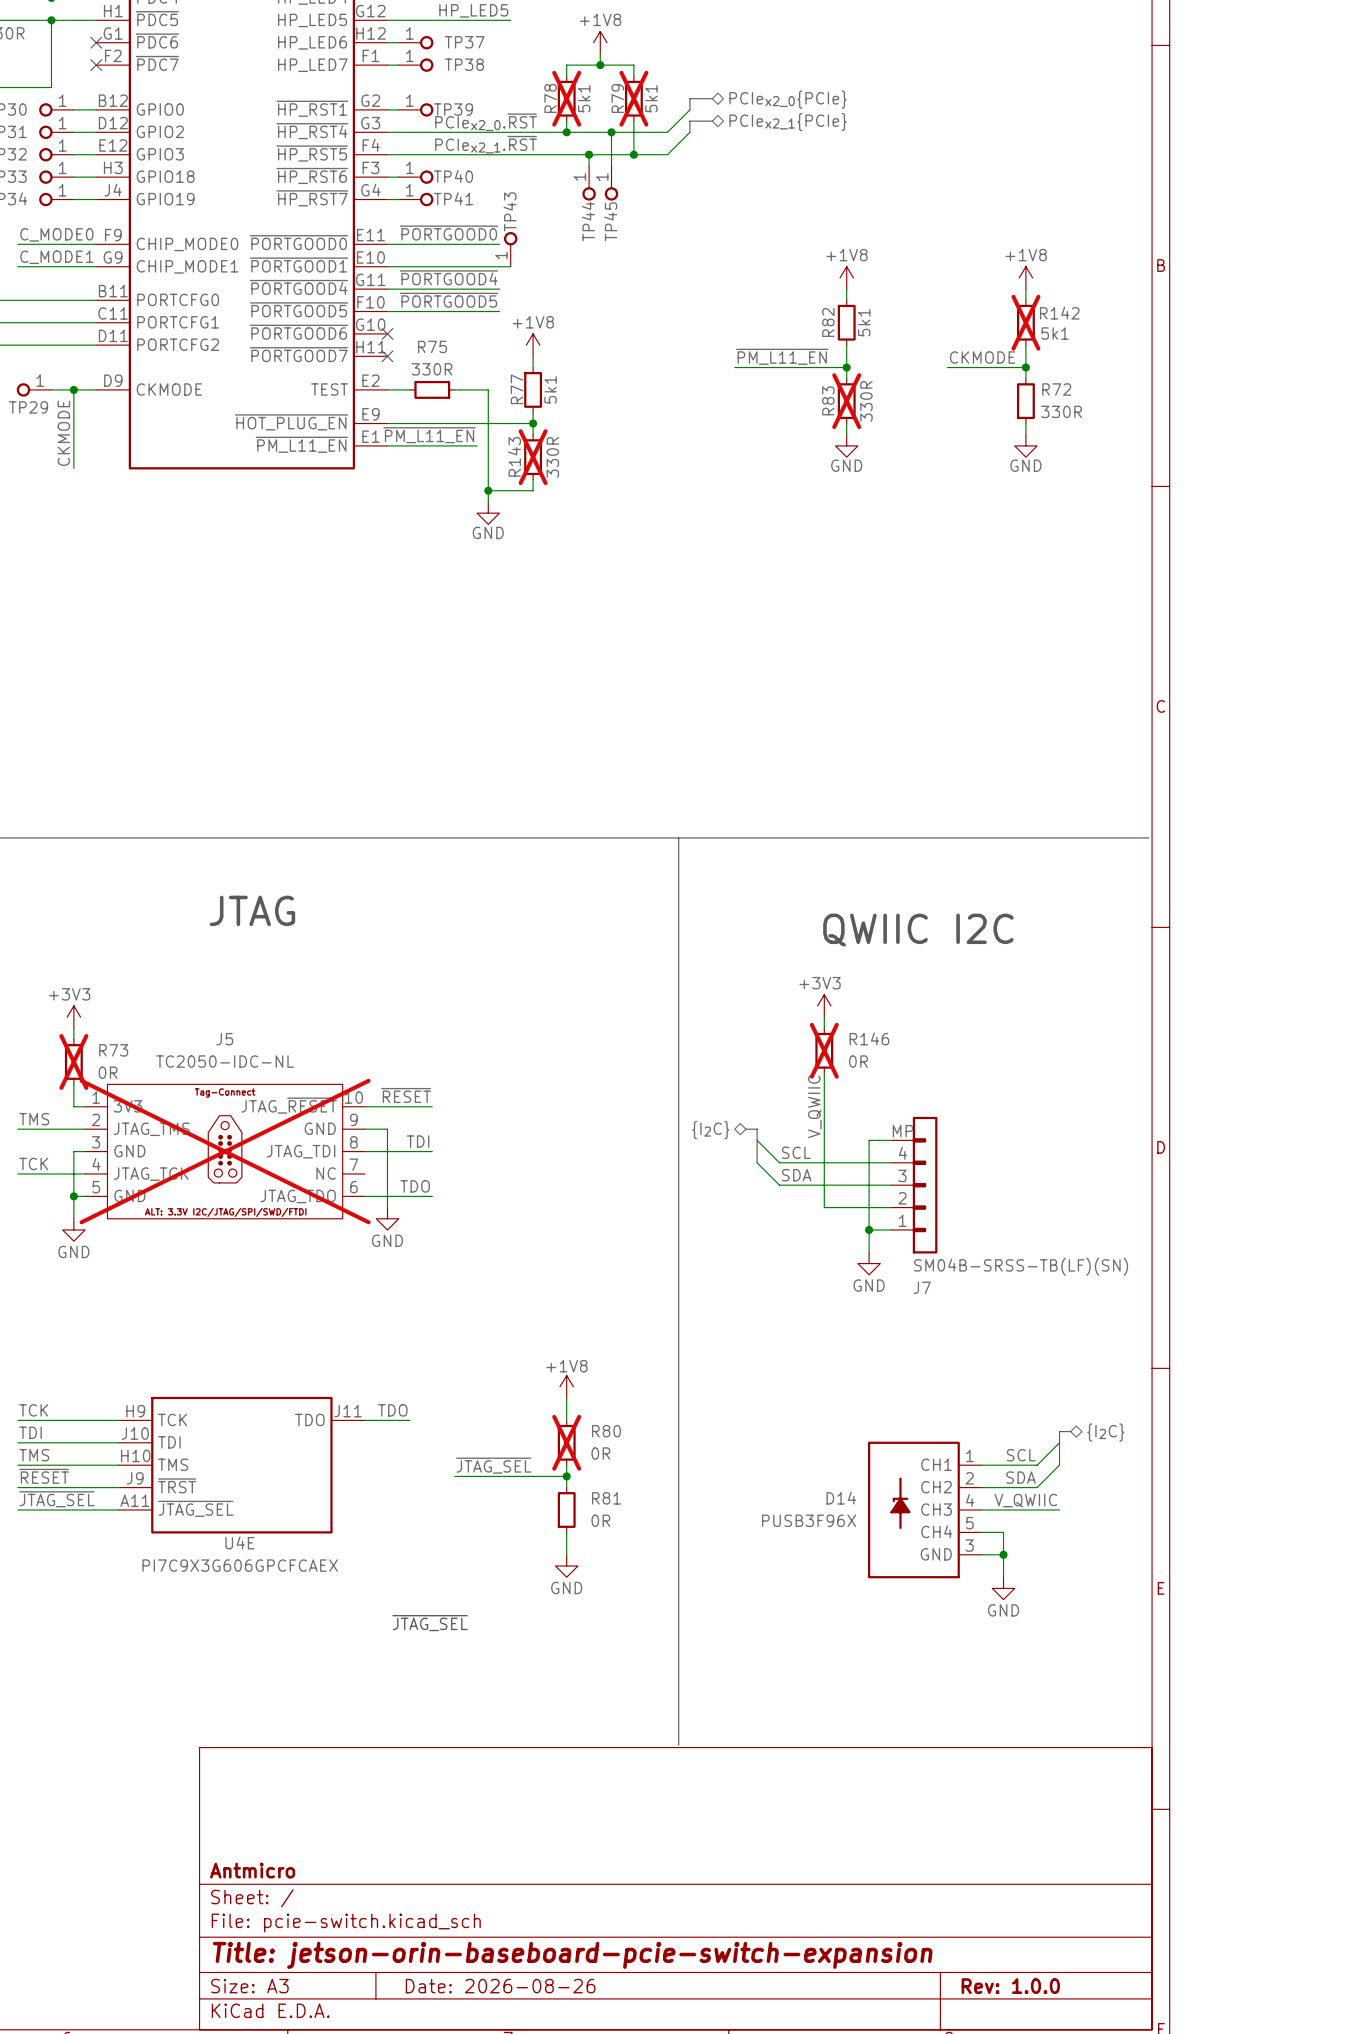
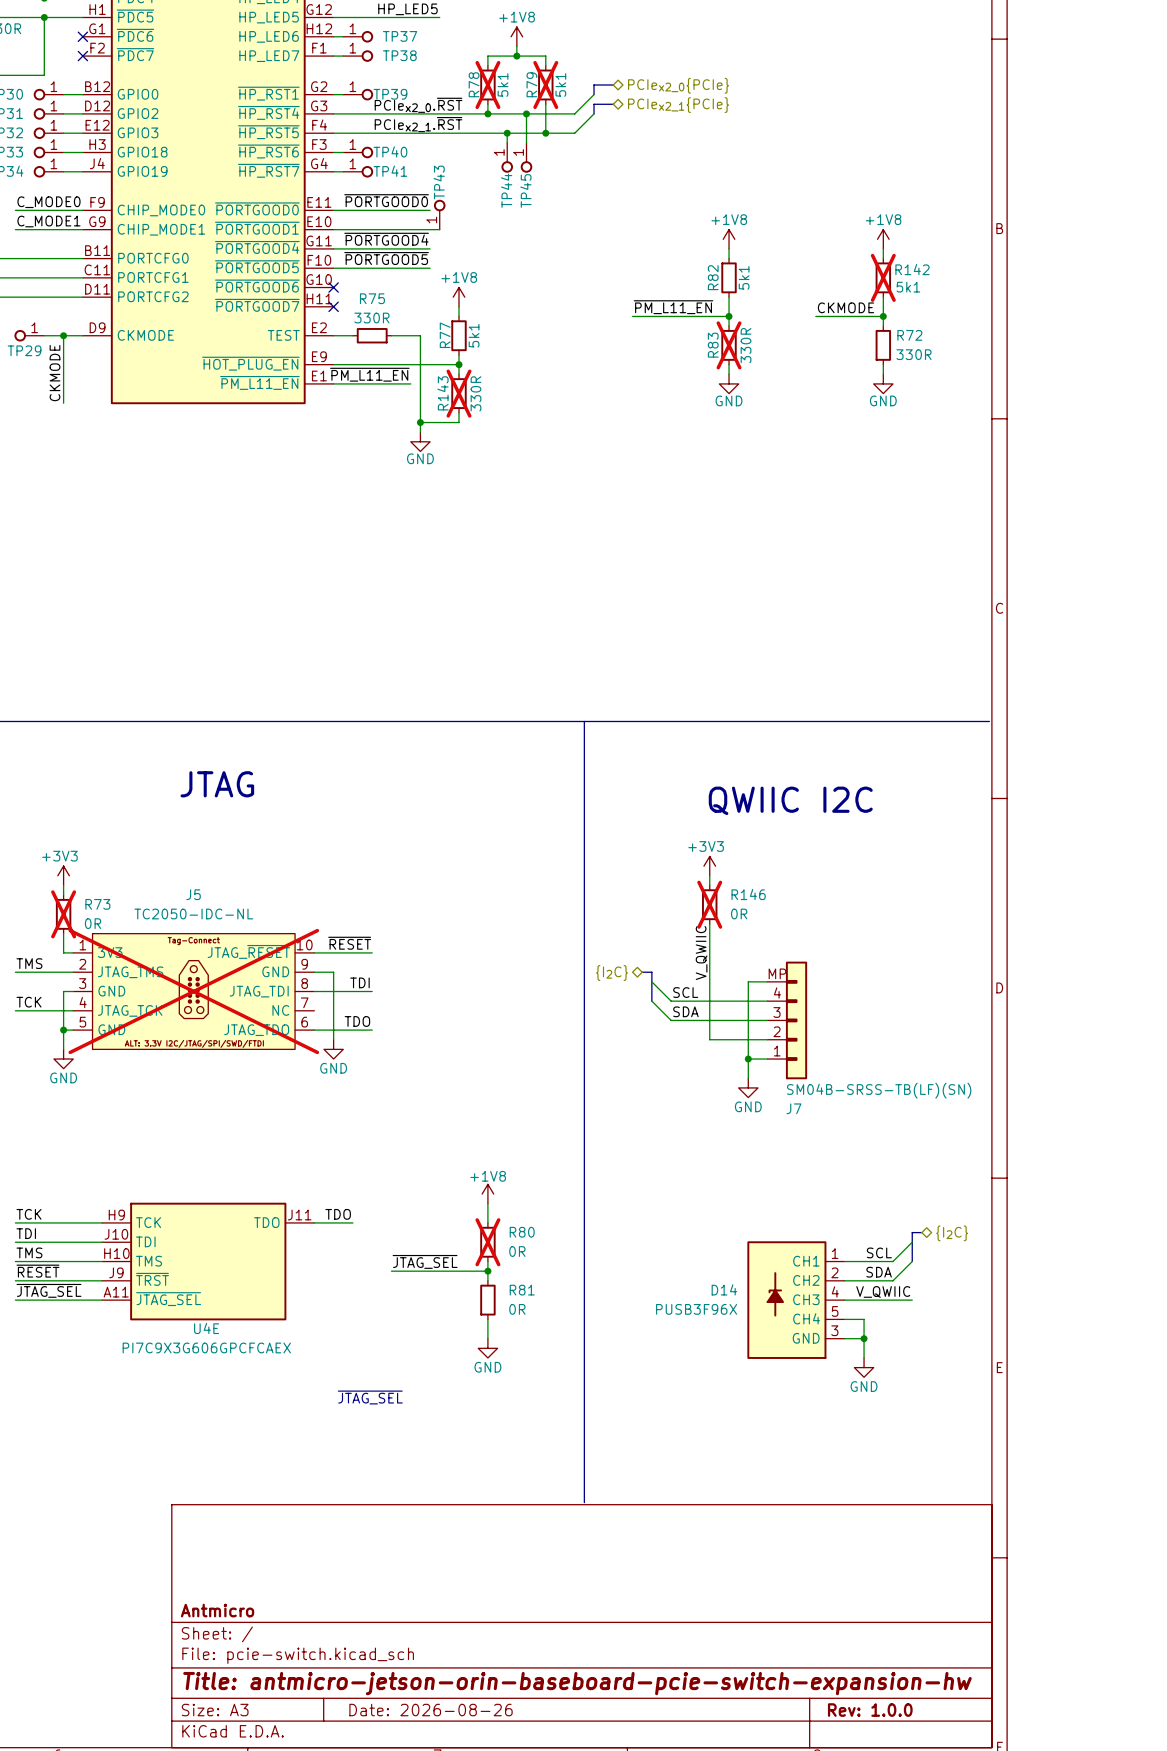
title block: Title: jetson-orin-baseboard-pcie-switch-expansion (572, 1955) -> Title: antmicro-jetson-orin-baseboard-pcie-switch-expansion-hw (577, 1683)

